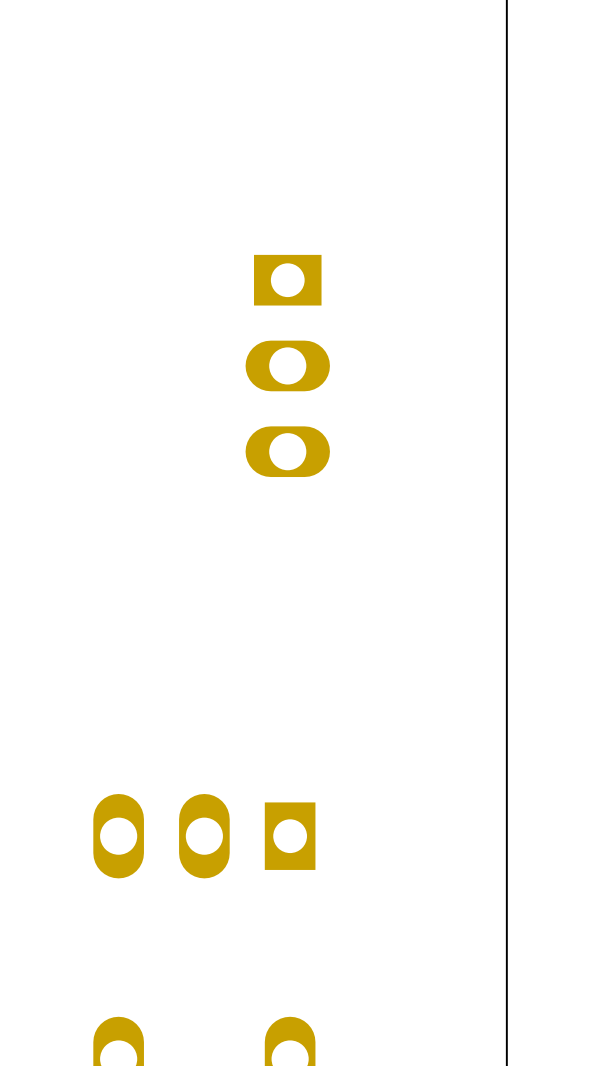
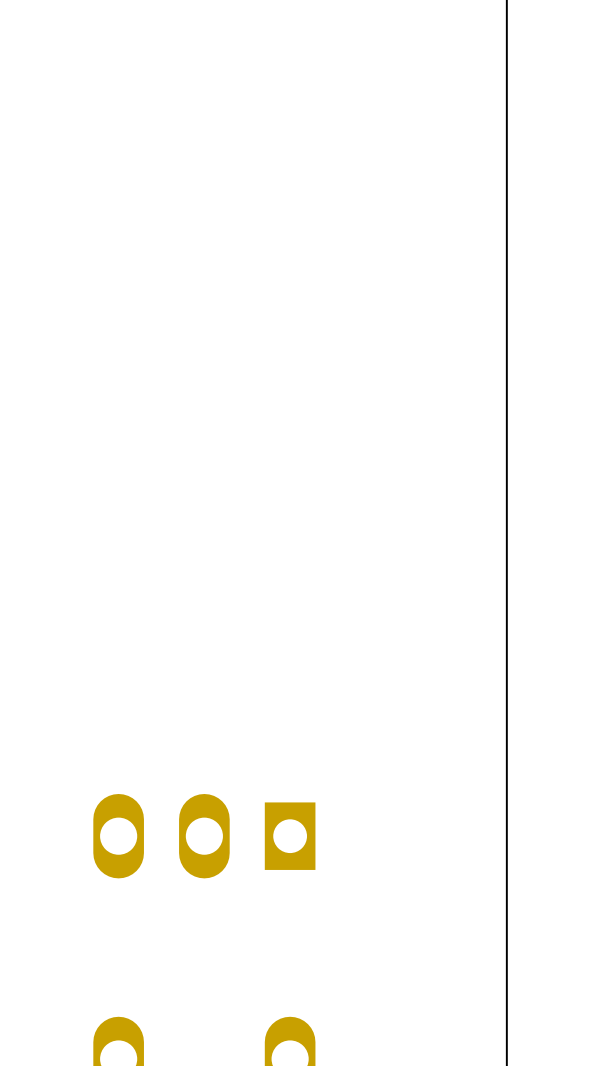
part: (287, 365) -> none

